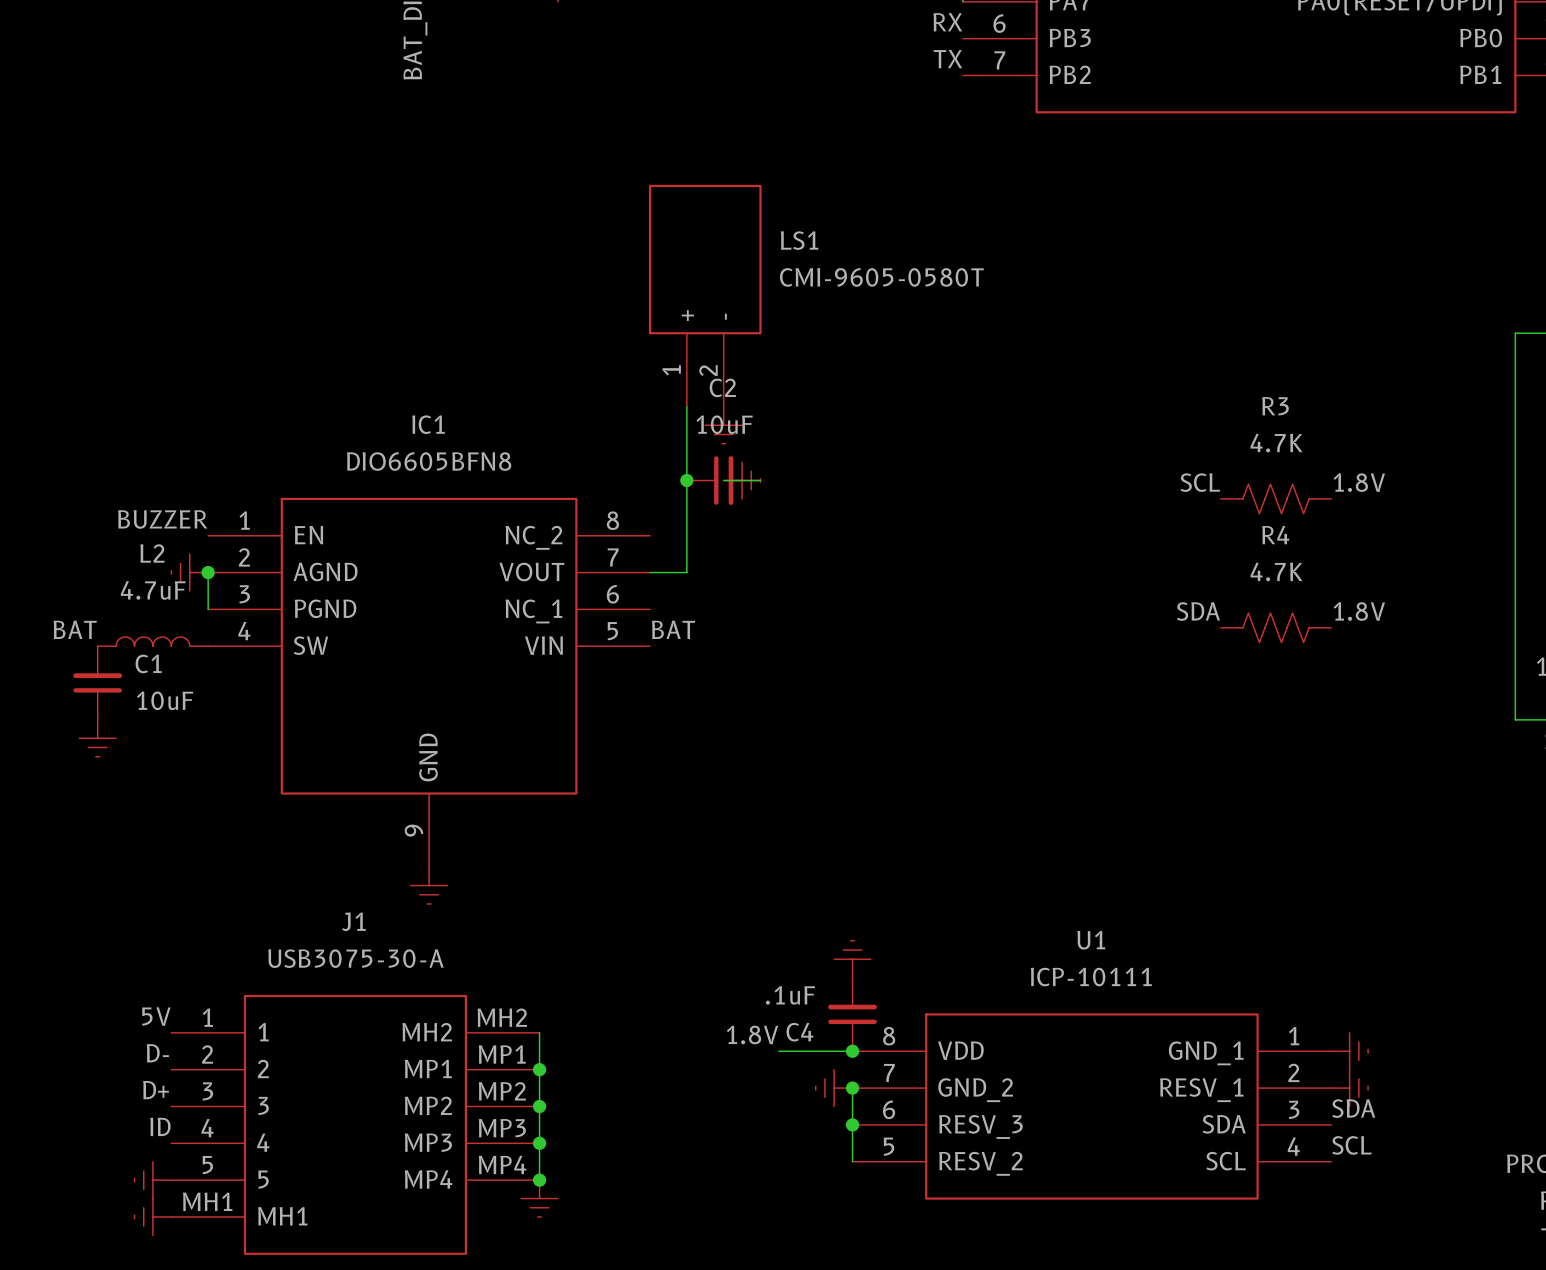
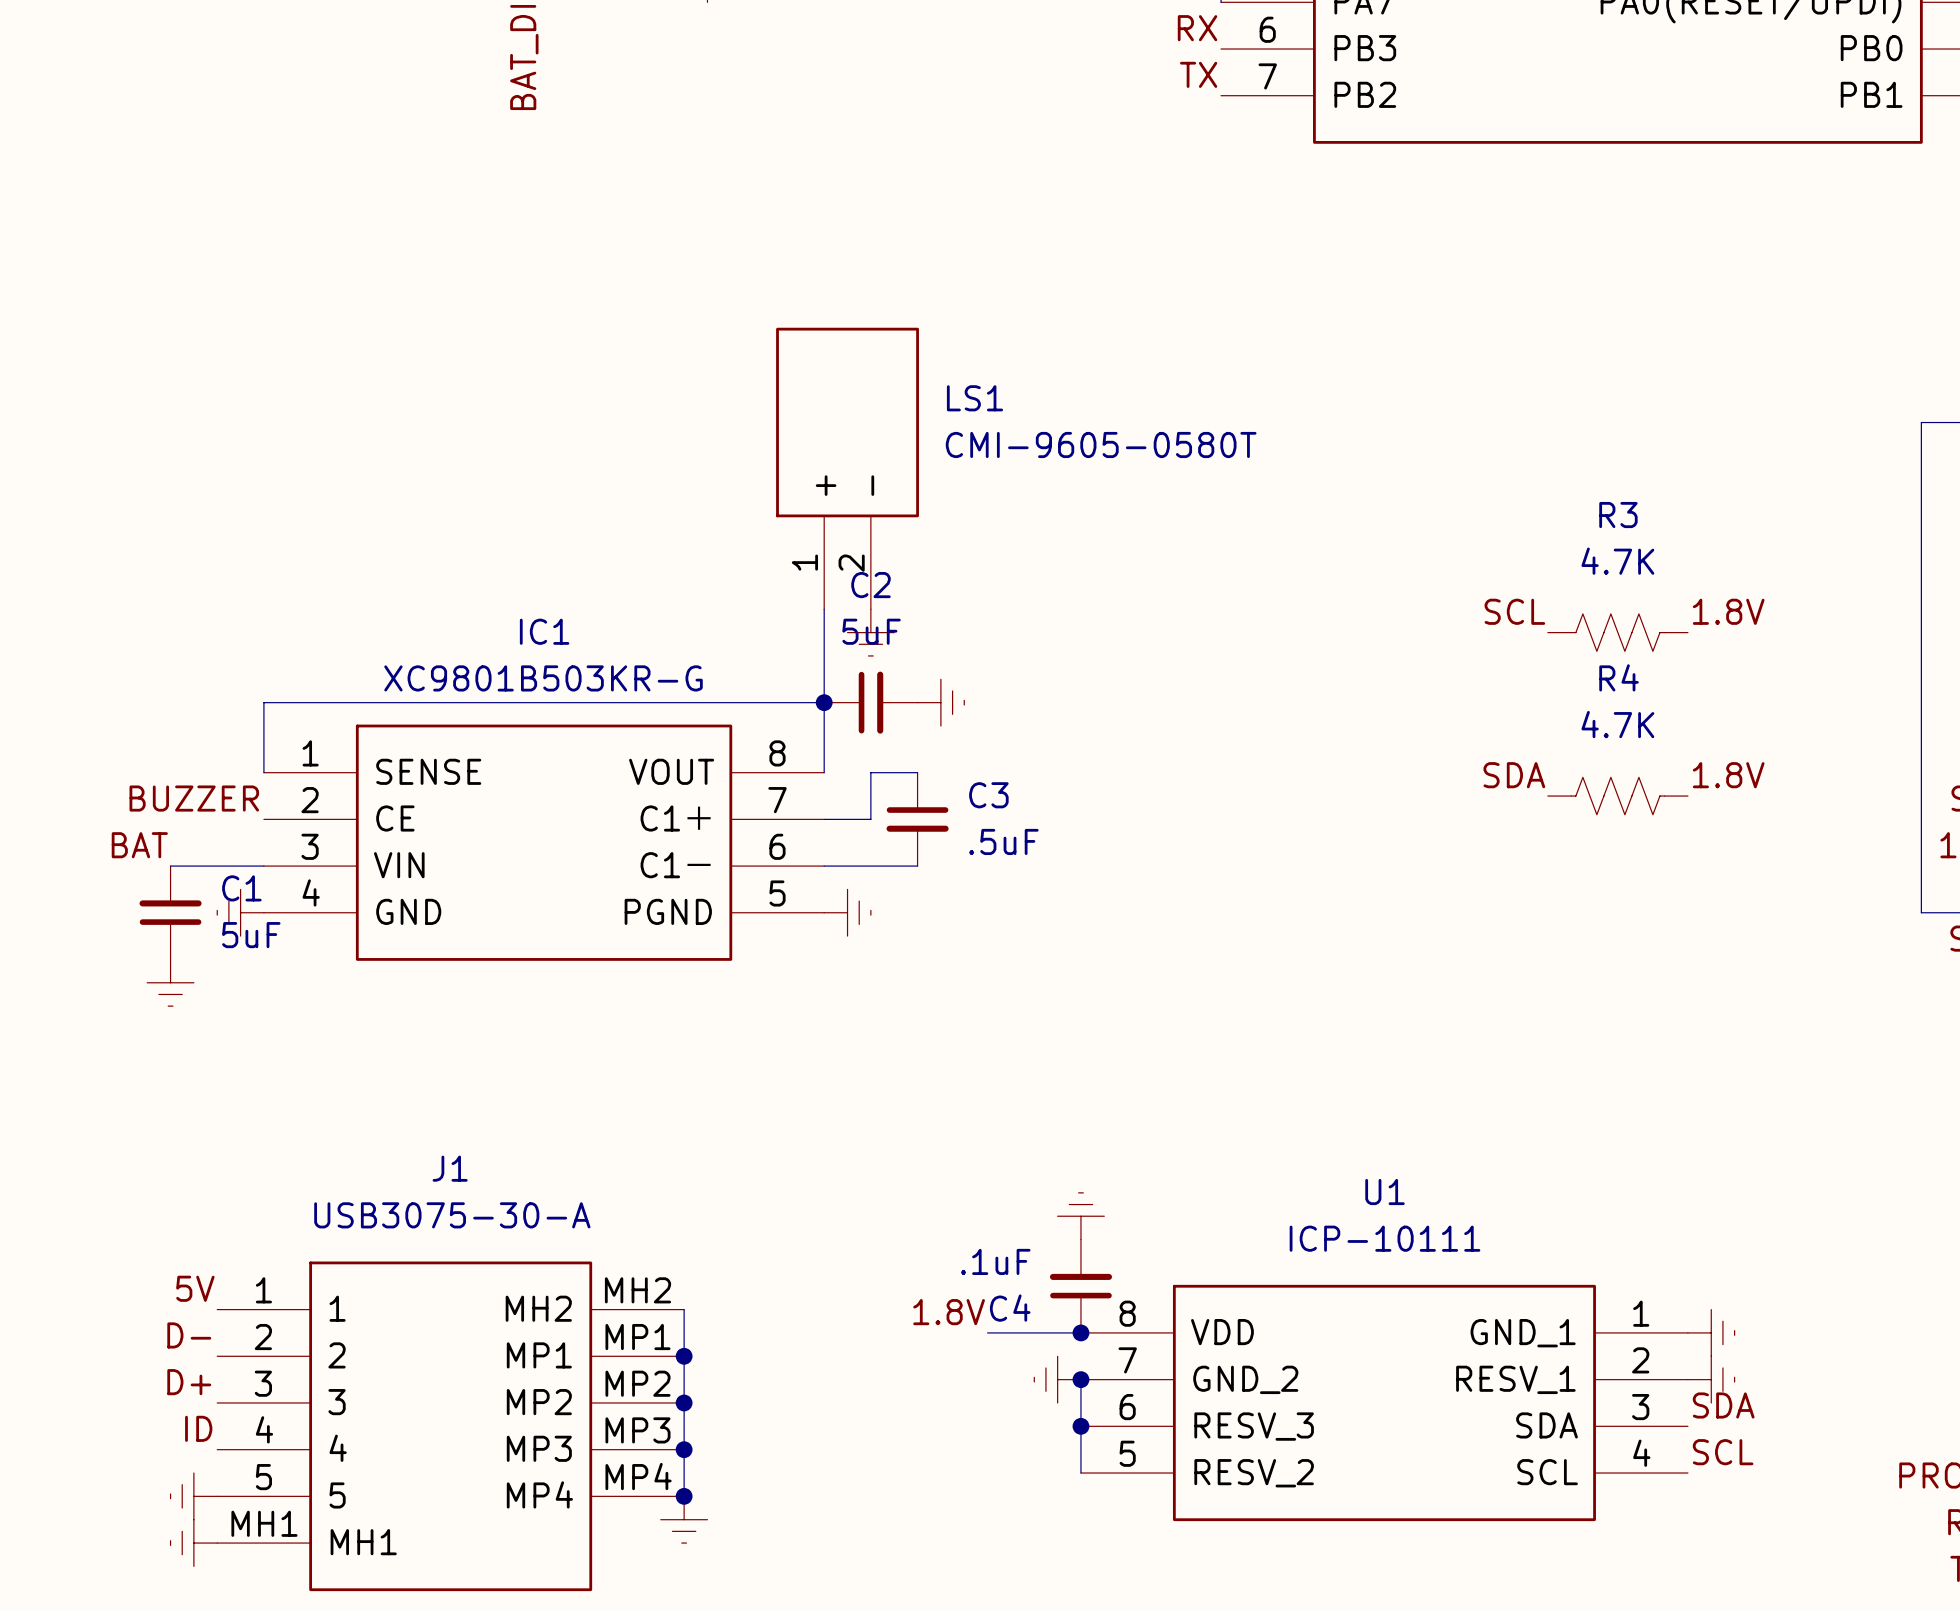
LS1 position: (705, 295) -> (847, 468)
wire: (686, 406) (686, 572) (650, 572) -> none
IC1 name position: IC1 (428, 424) -> IC1 (544, 631)
C2 value: 10uF (724, 424) -> 5uF (871, 631)
power symbol: (723, 425) -> none
IC1 value: DIO6605BFN8 (429, 461) -> XC9801B503KR-G (543, 678)
wire: none -> (824, 609) (824, 772)
junction position: (686, 480) -> (824, 702)
wire: (723, 480) (760, 480) -> none
C2 position: (723, 480) -> (870, 702)
power symbol: (742, 480) -> none
IC1 symbol: [208, 497, 651, 868] -> [263, 724, 825, 961]
power symbol: none -> (870, 632)
label position: BUZZER (162, 519) -> BUZZER (194, 798)
wire: none -> (824, 702) (263, 702) (263, 725)
power symbol: none -> (940, 702)
power symbol: (189, 572) -> none
junction: (208, 572) -> none
wire: none -> (917, 772) (870, 772) (870, 819) (824, 819)
label position: BAT (75, 629) -> BAT (139, 845)
label: BAT (673, 629) -> none
L2: 4.7uF (152, 641) -> none
C3: none -> .5uF (917, 819)
C1 position: (97, 683) -> (170, 912)
wire: none -> (170, 866) (263, 866)
wire: none -> (824, 866) (917, 866)
C1 value: 10uF (165, 700) -> 5uF (251, 935)
power symbol: none -> (240, 912)
power symbol: none -> (847, 912)
power symbol: (97, 738) -> none
power symbol: none -> (170, 982)
power symbol: (429, 885) -> none

